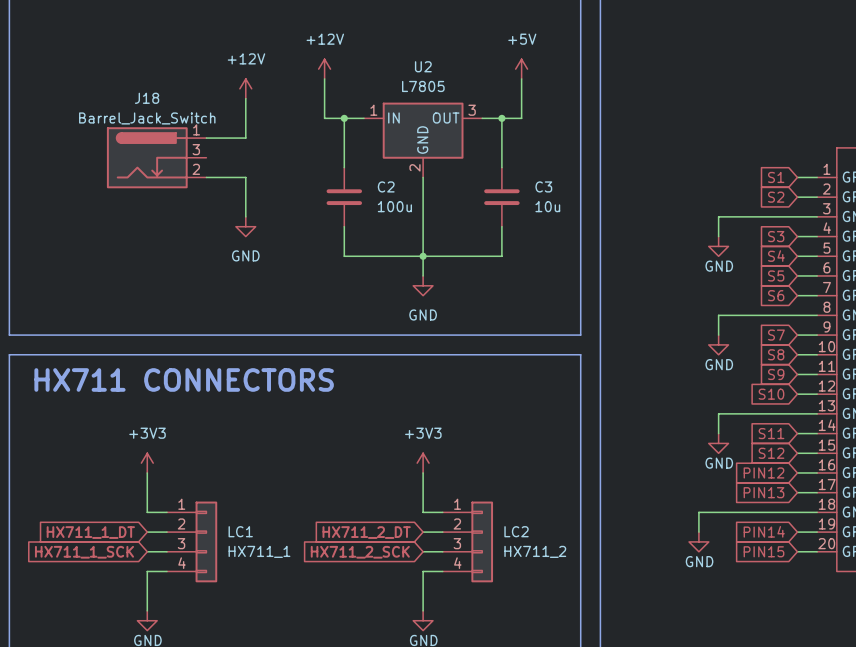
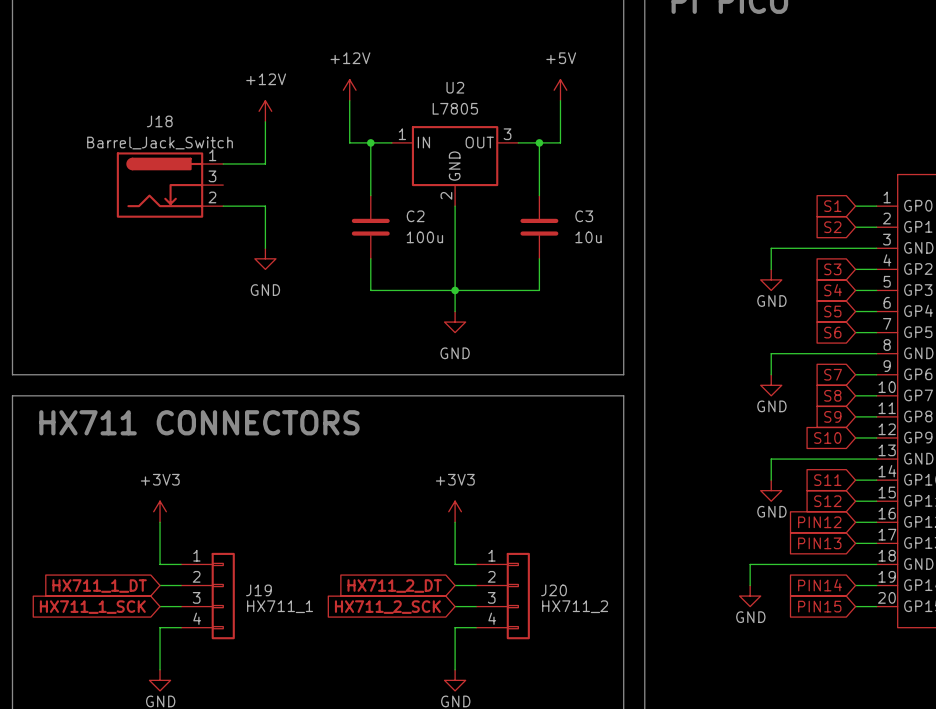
LC1 name: LC1 (240, 531) -> J19 (258, 590)
LC2 name: LC2 (516, 531) -> J20 (554, 590)

